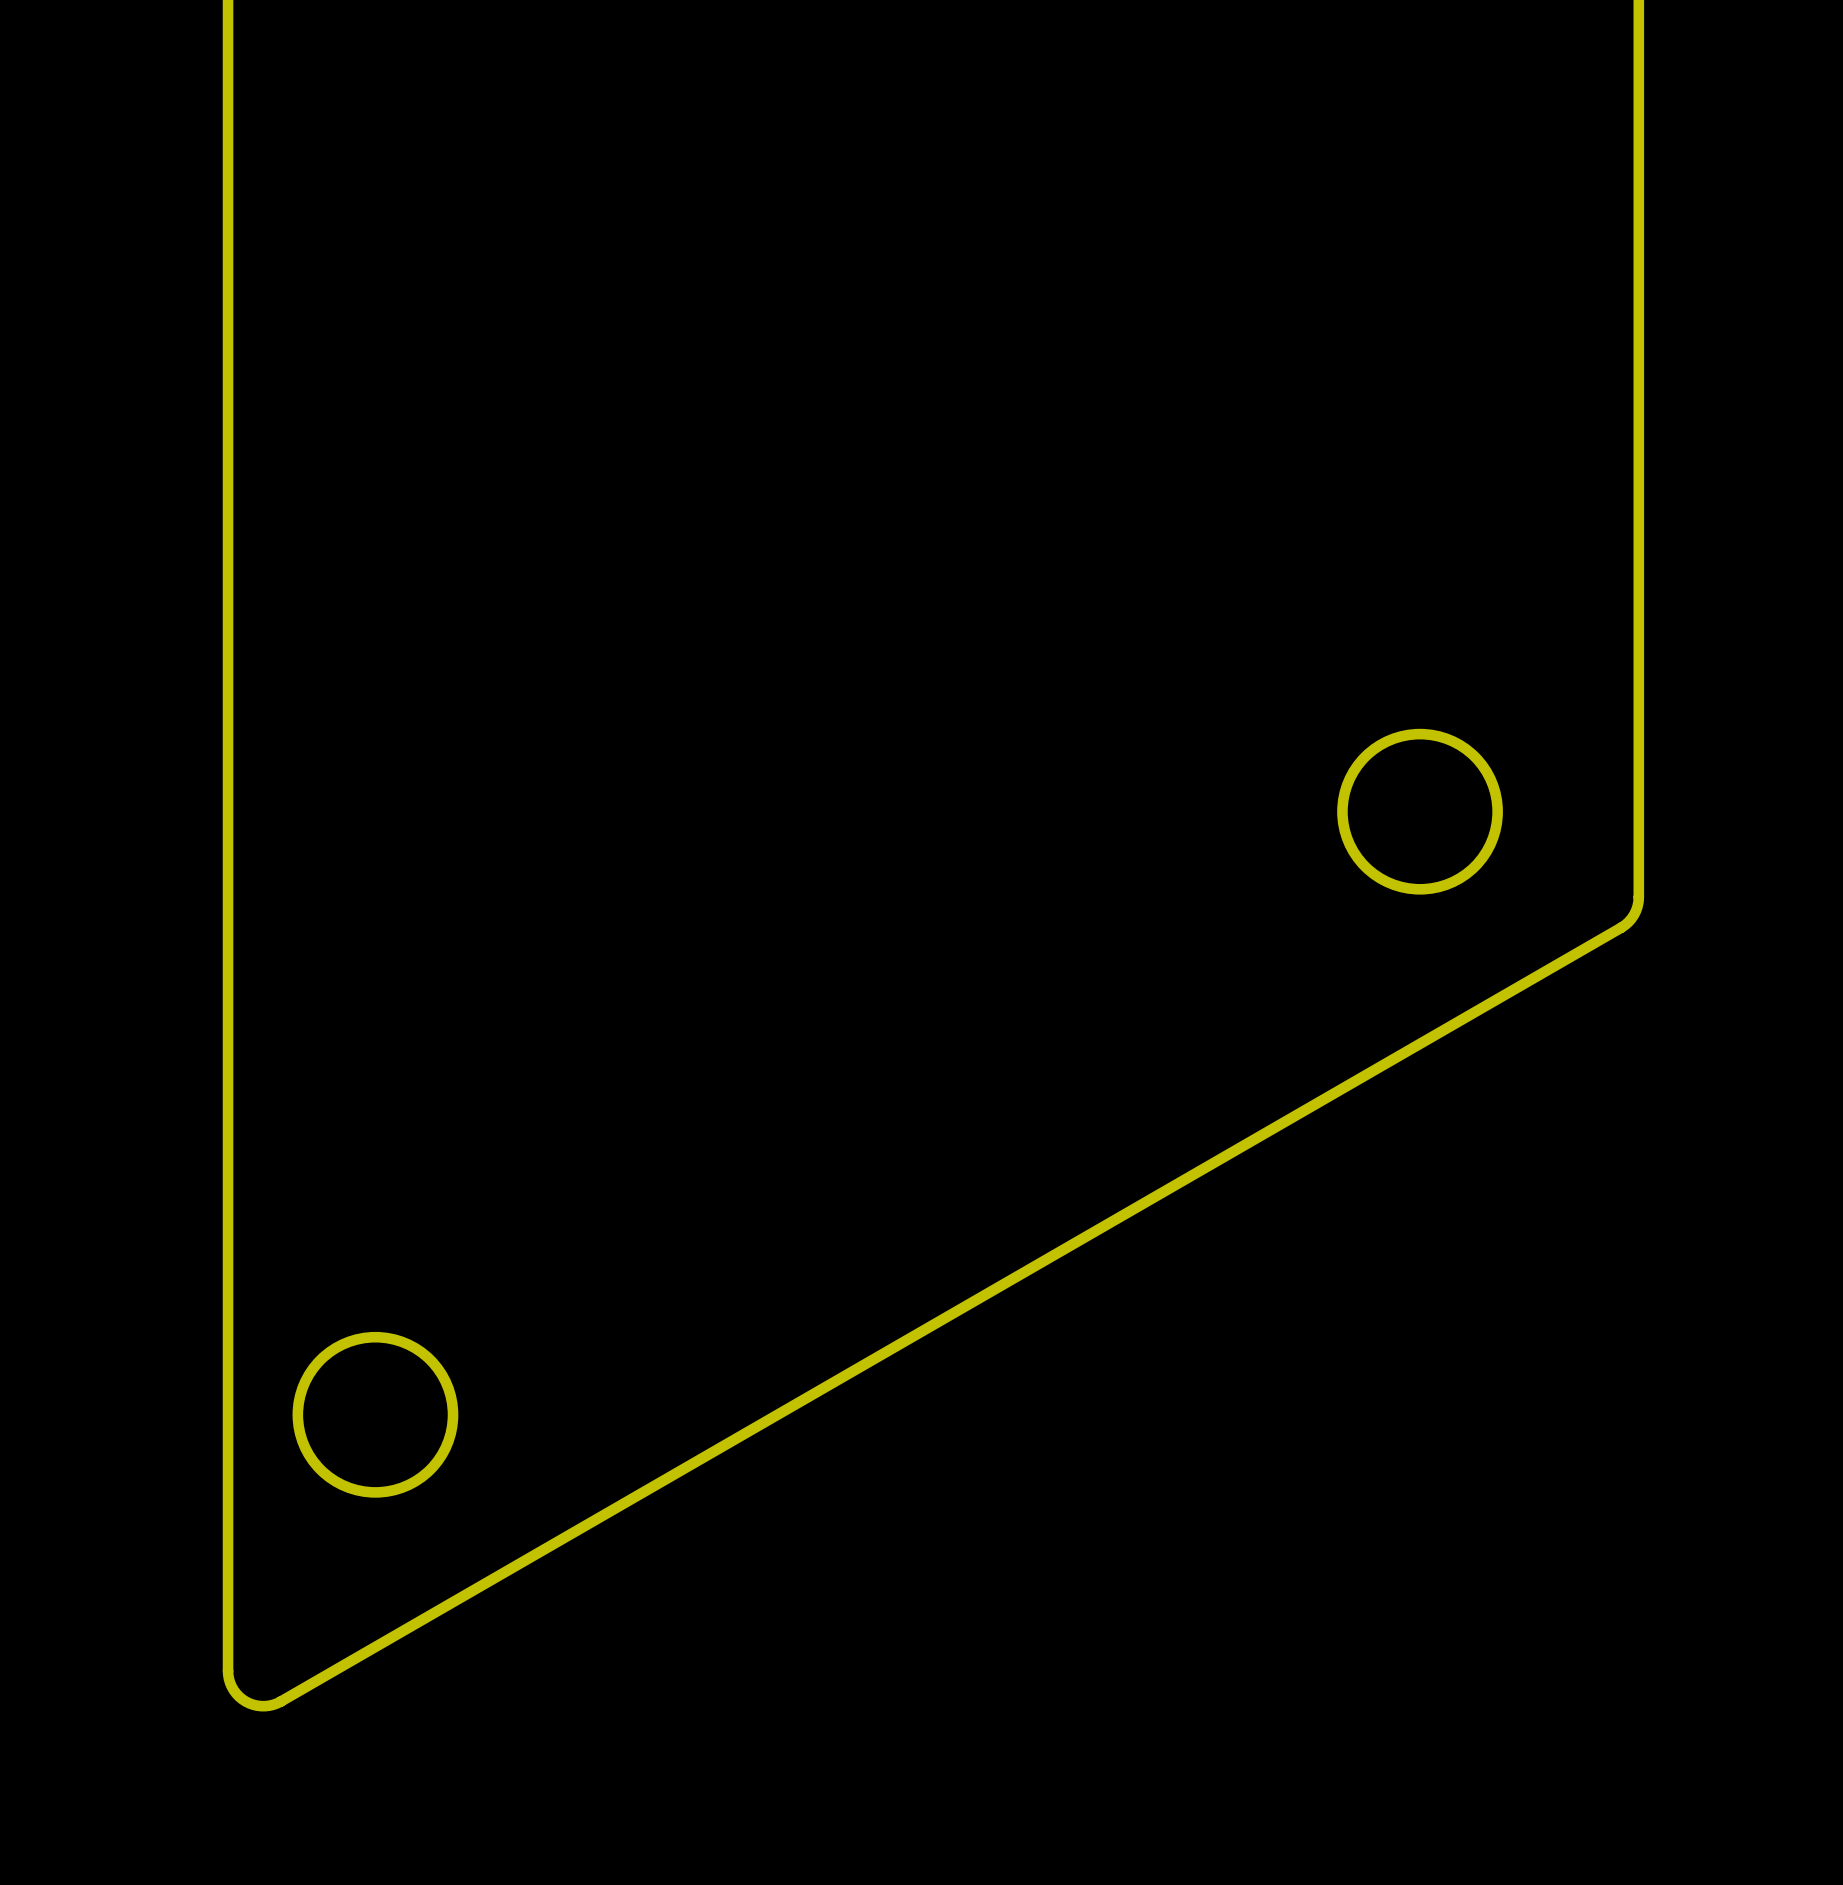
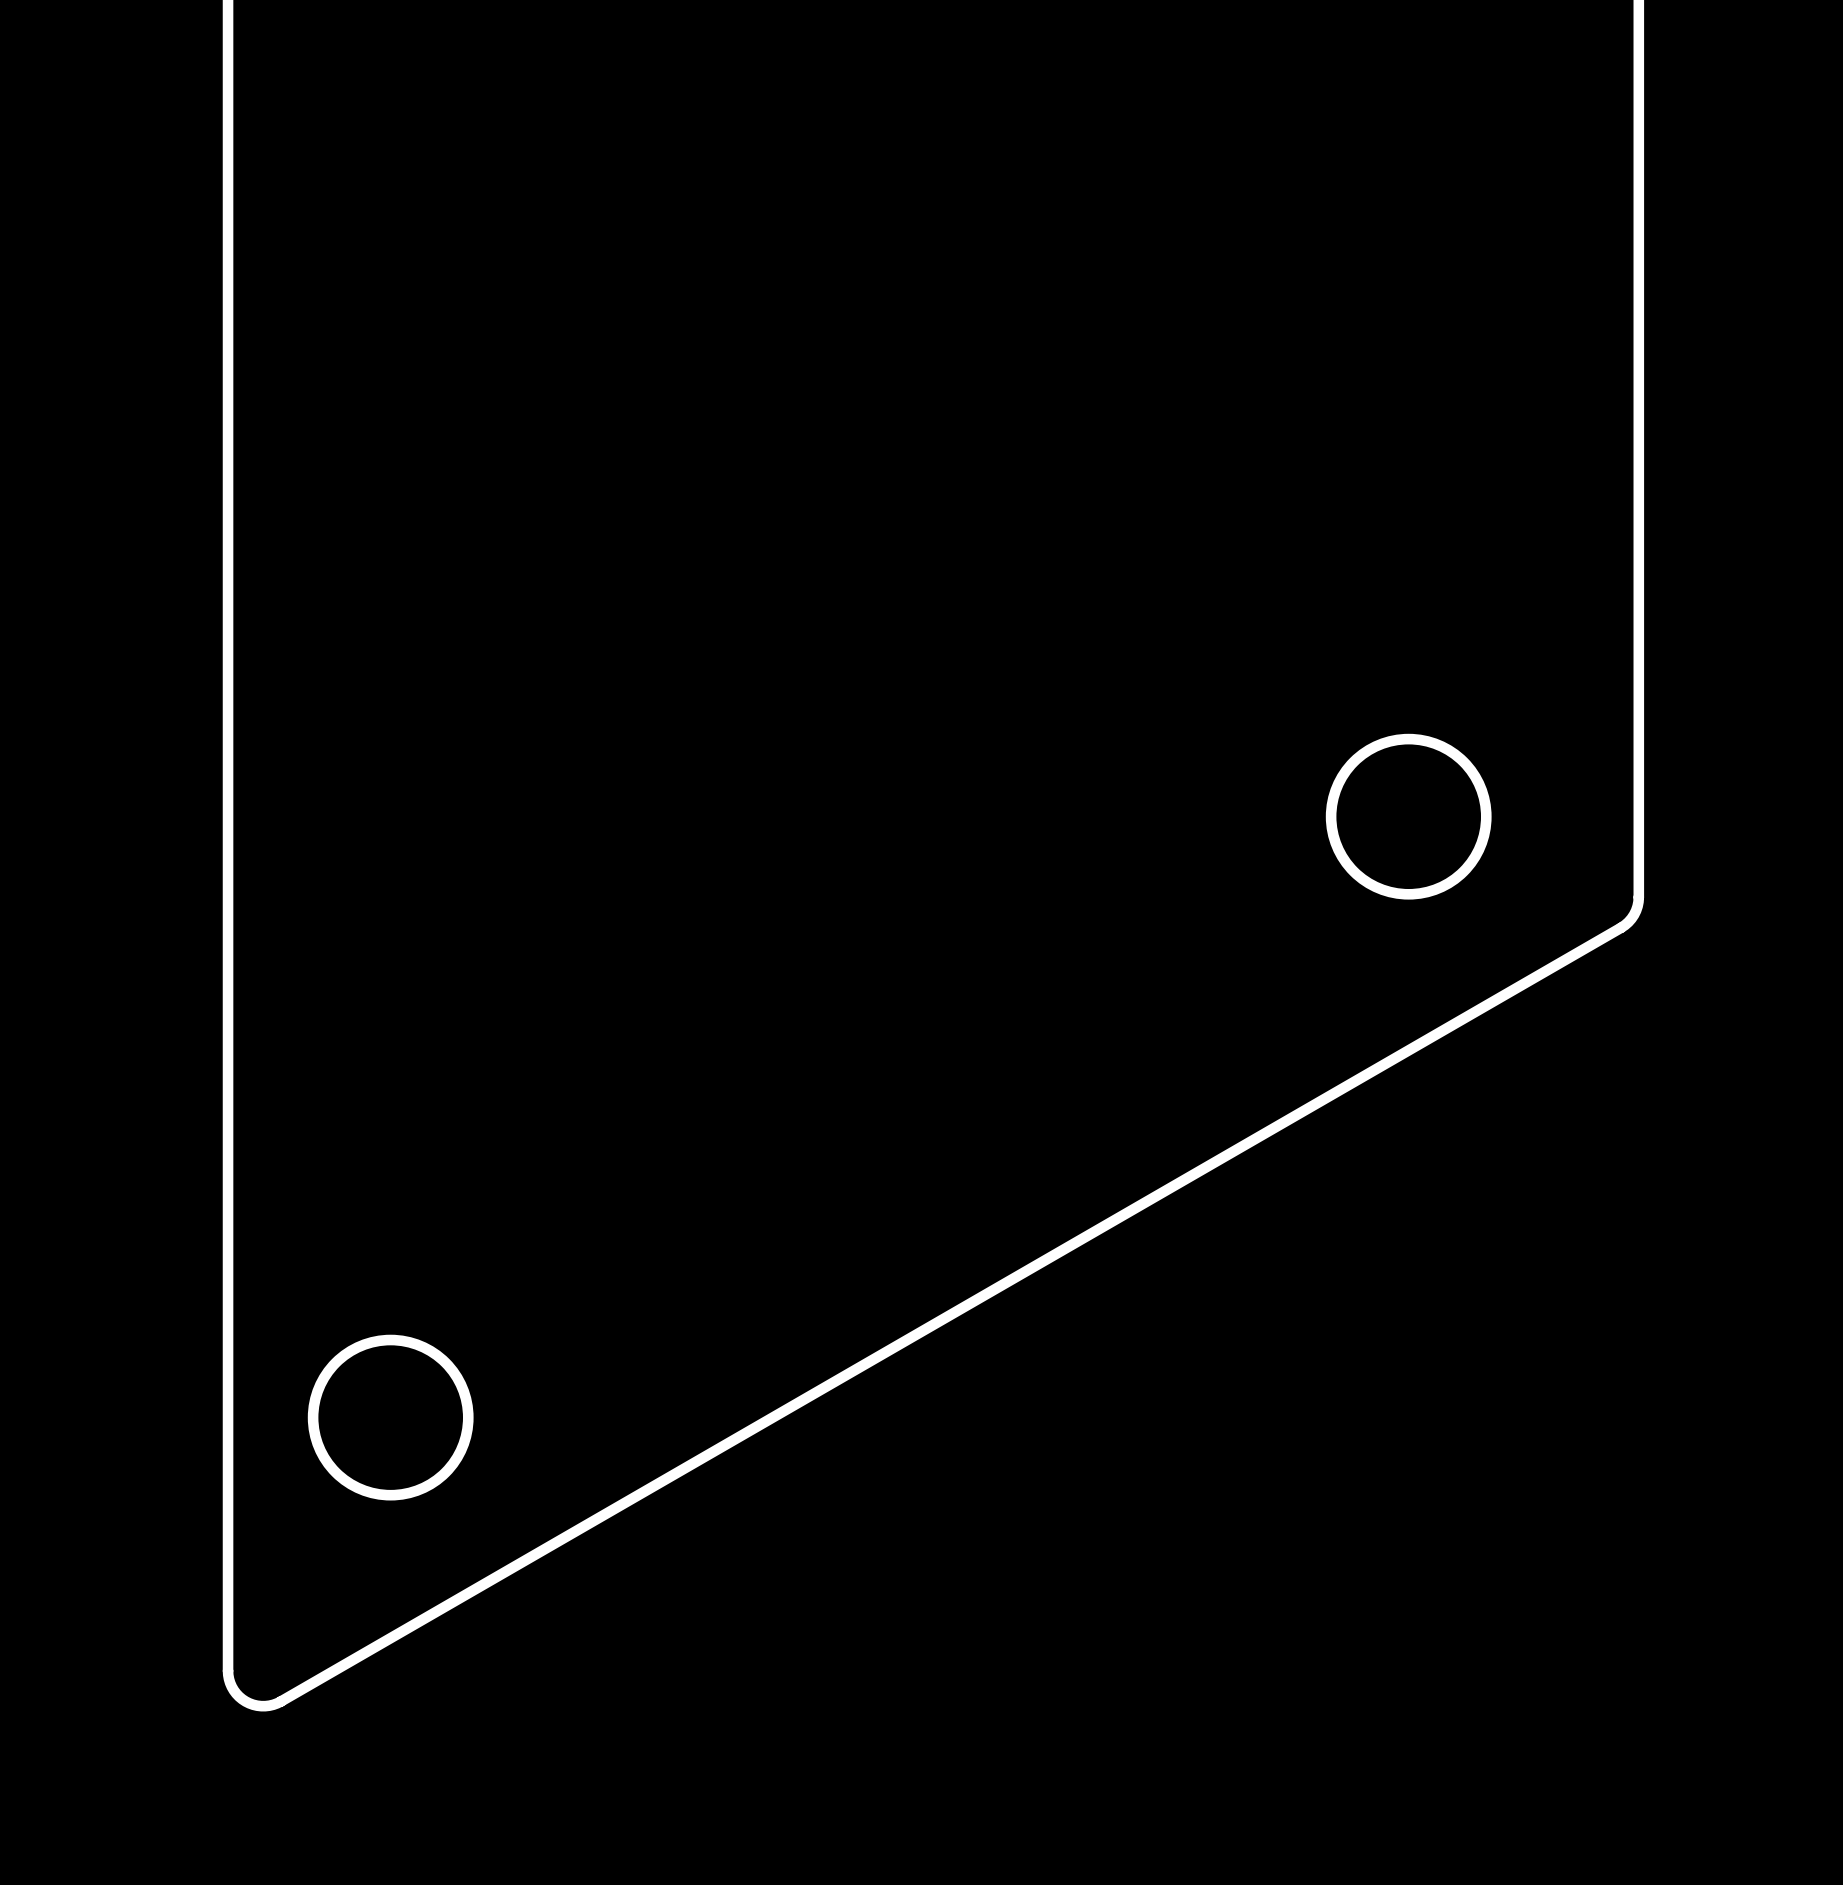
round board edge position: (1420, 811) -> (1408, 816)
round board edge position: (375, 1414) -> (390, 1417)

